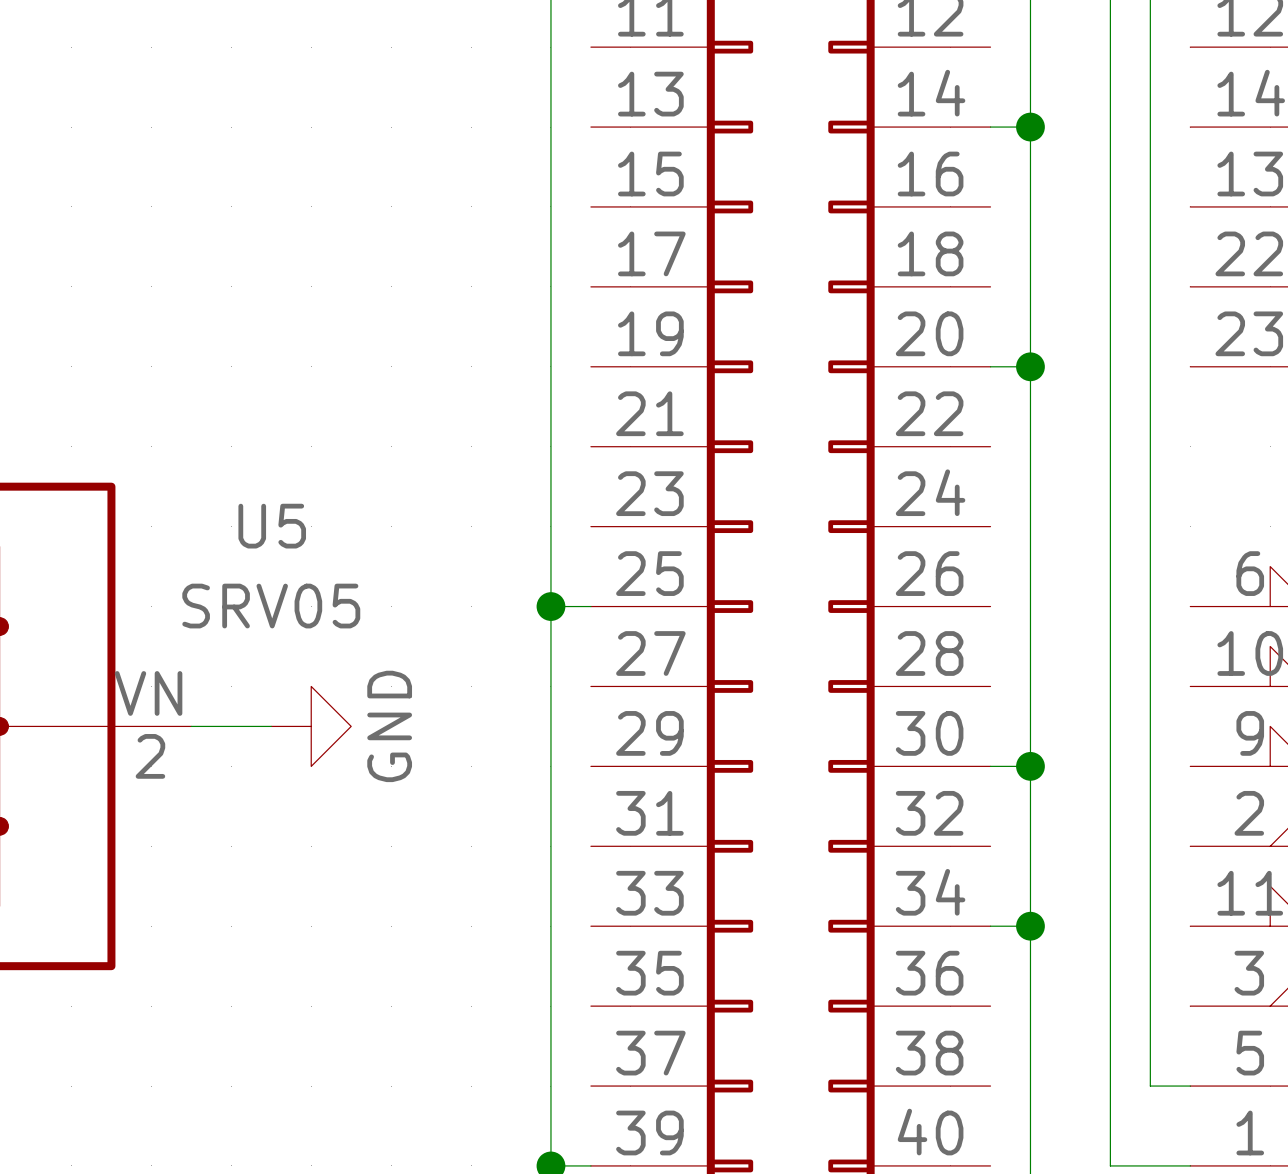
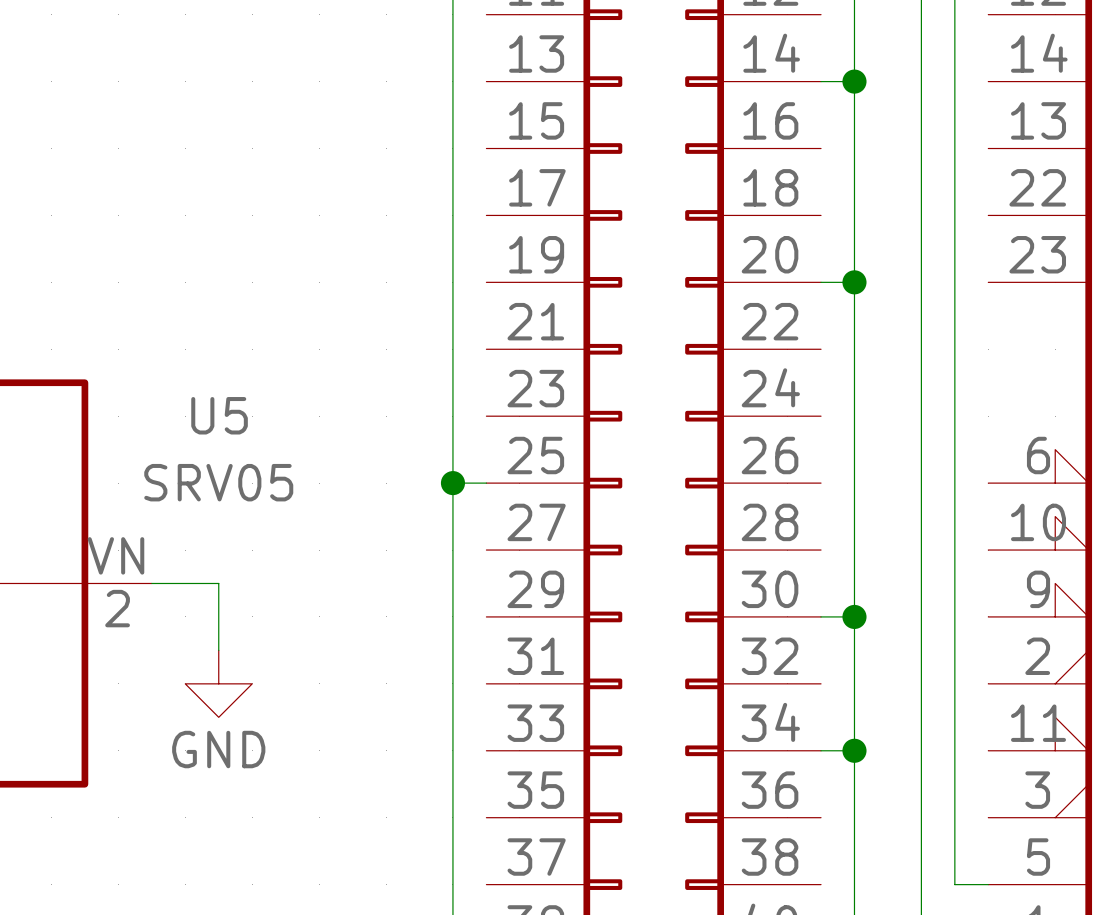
wire: none -> (218, 583) (218, 650)
power symbol rotation: 0° (311, 726) -> 90° clockwise (218, 683)
power symbol position: GND (311, 726) -> GND (218, 683)

